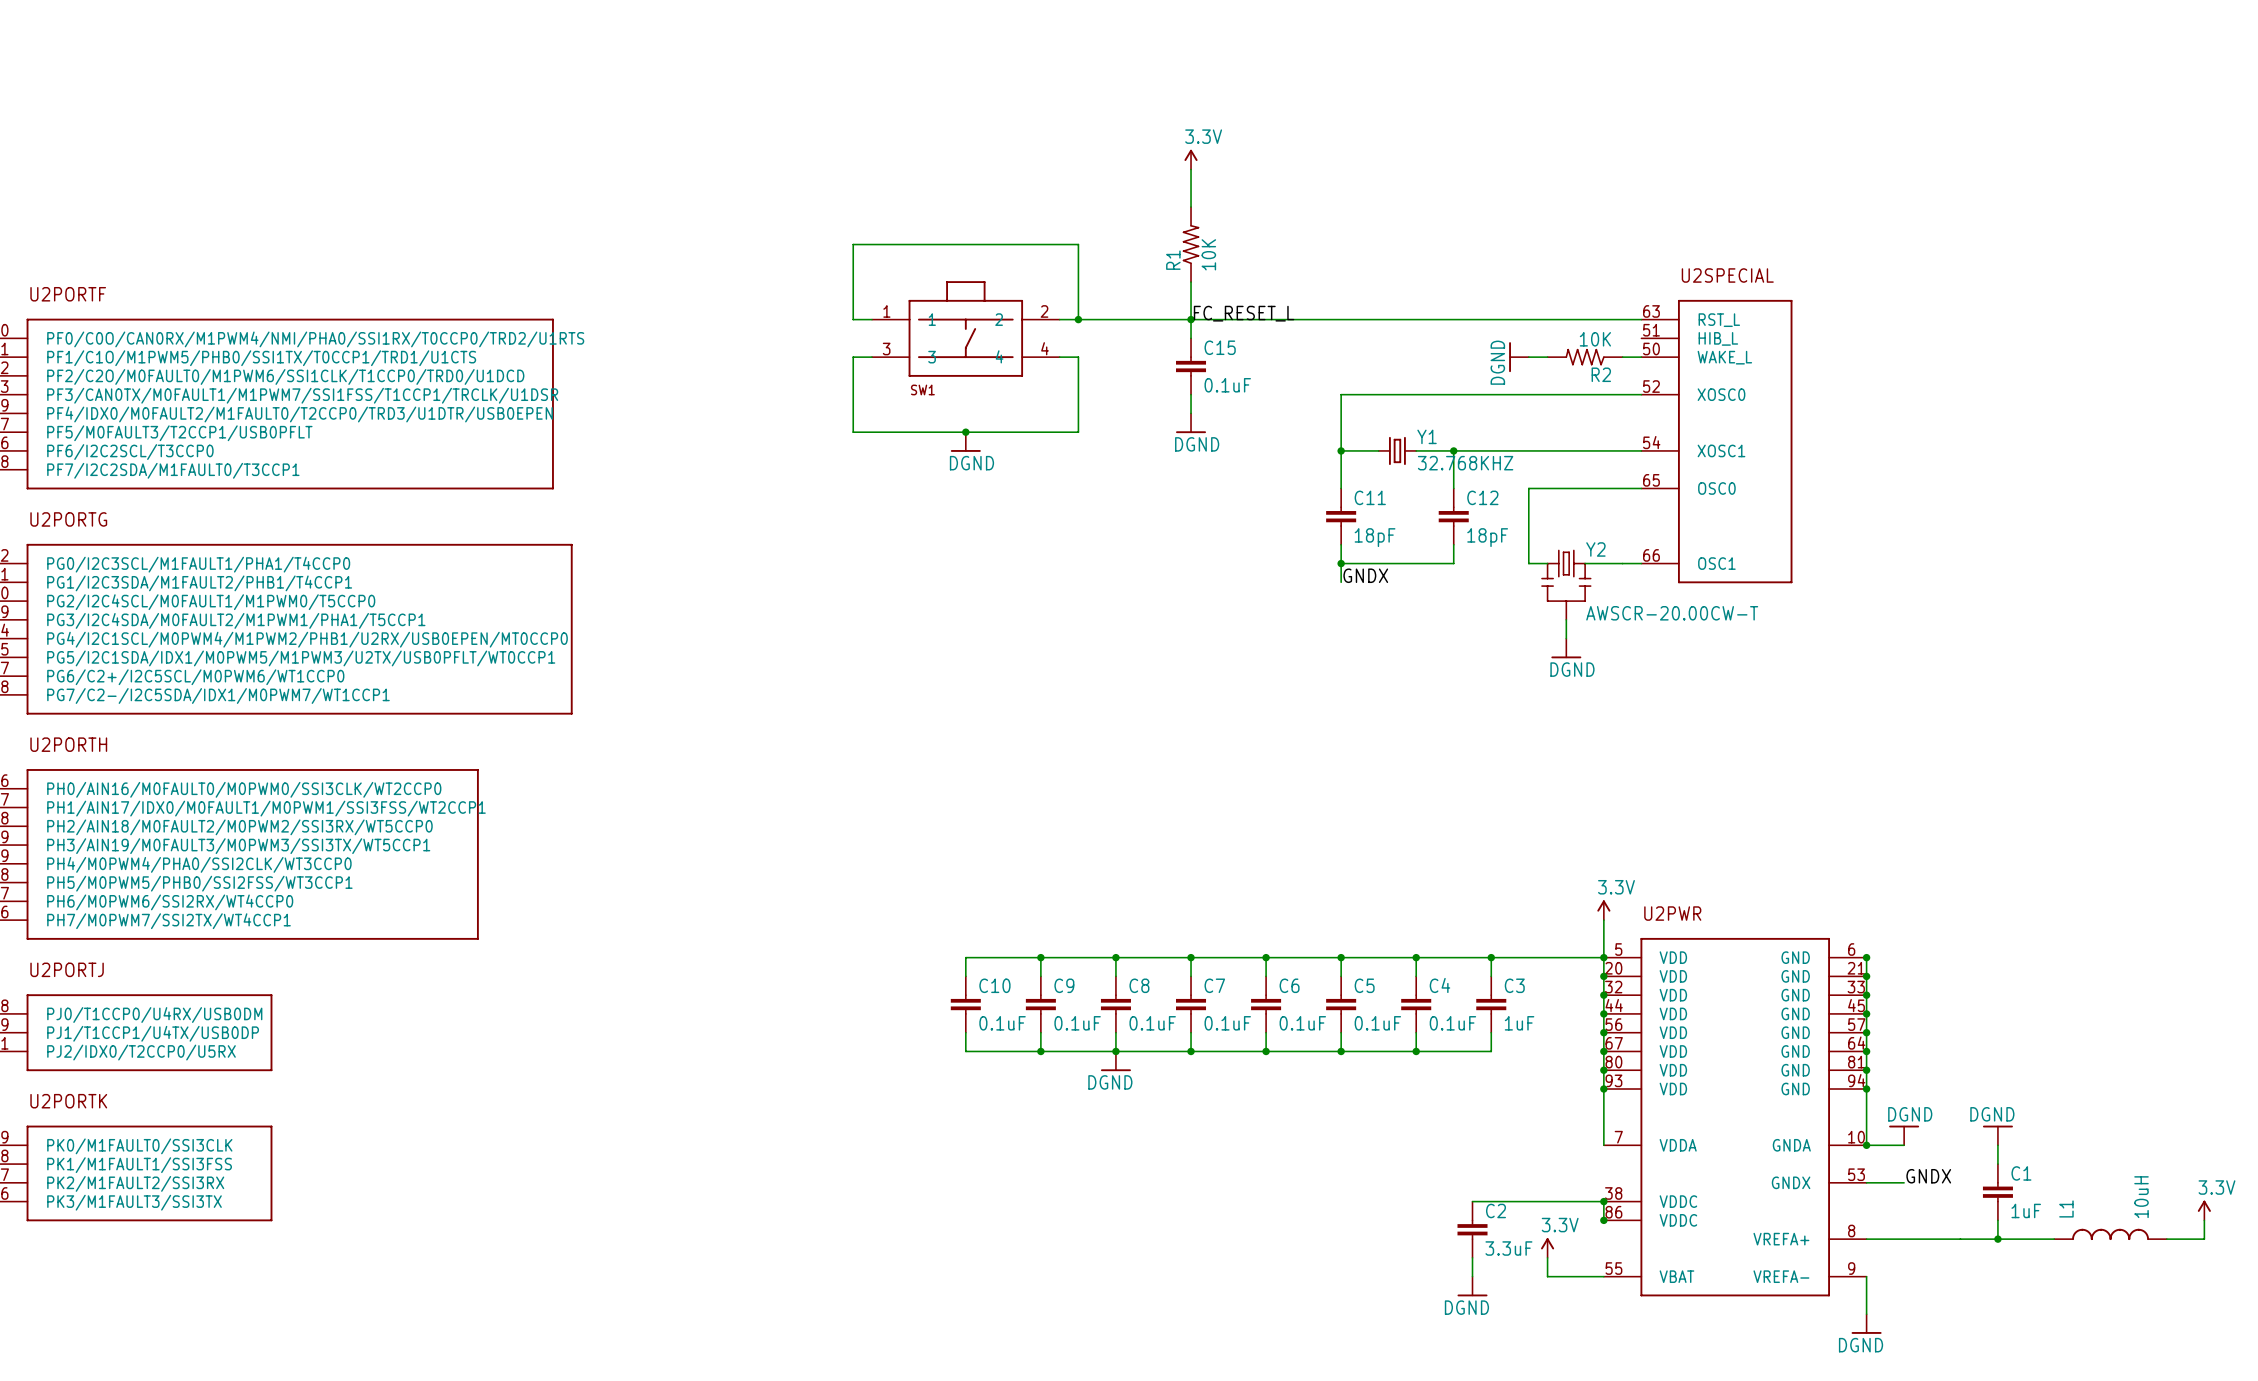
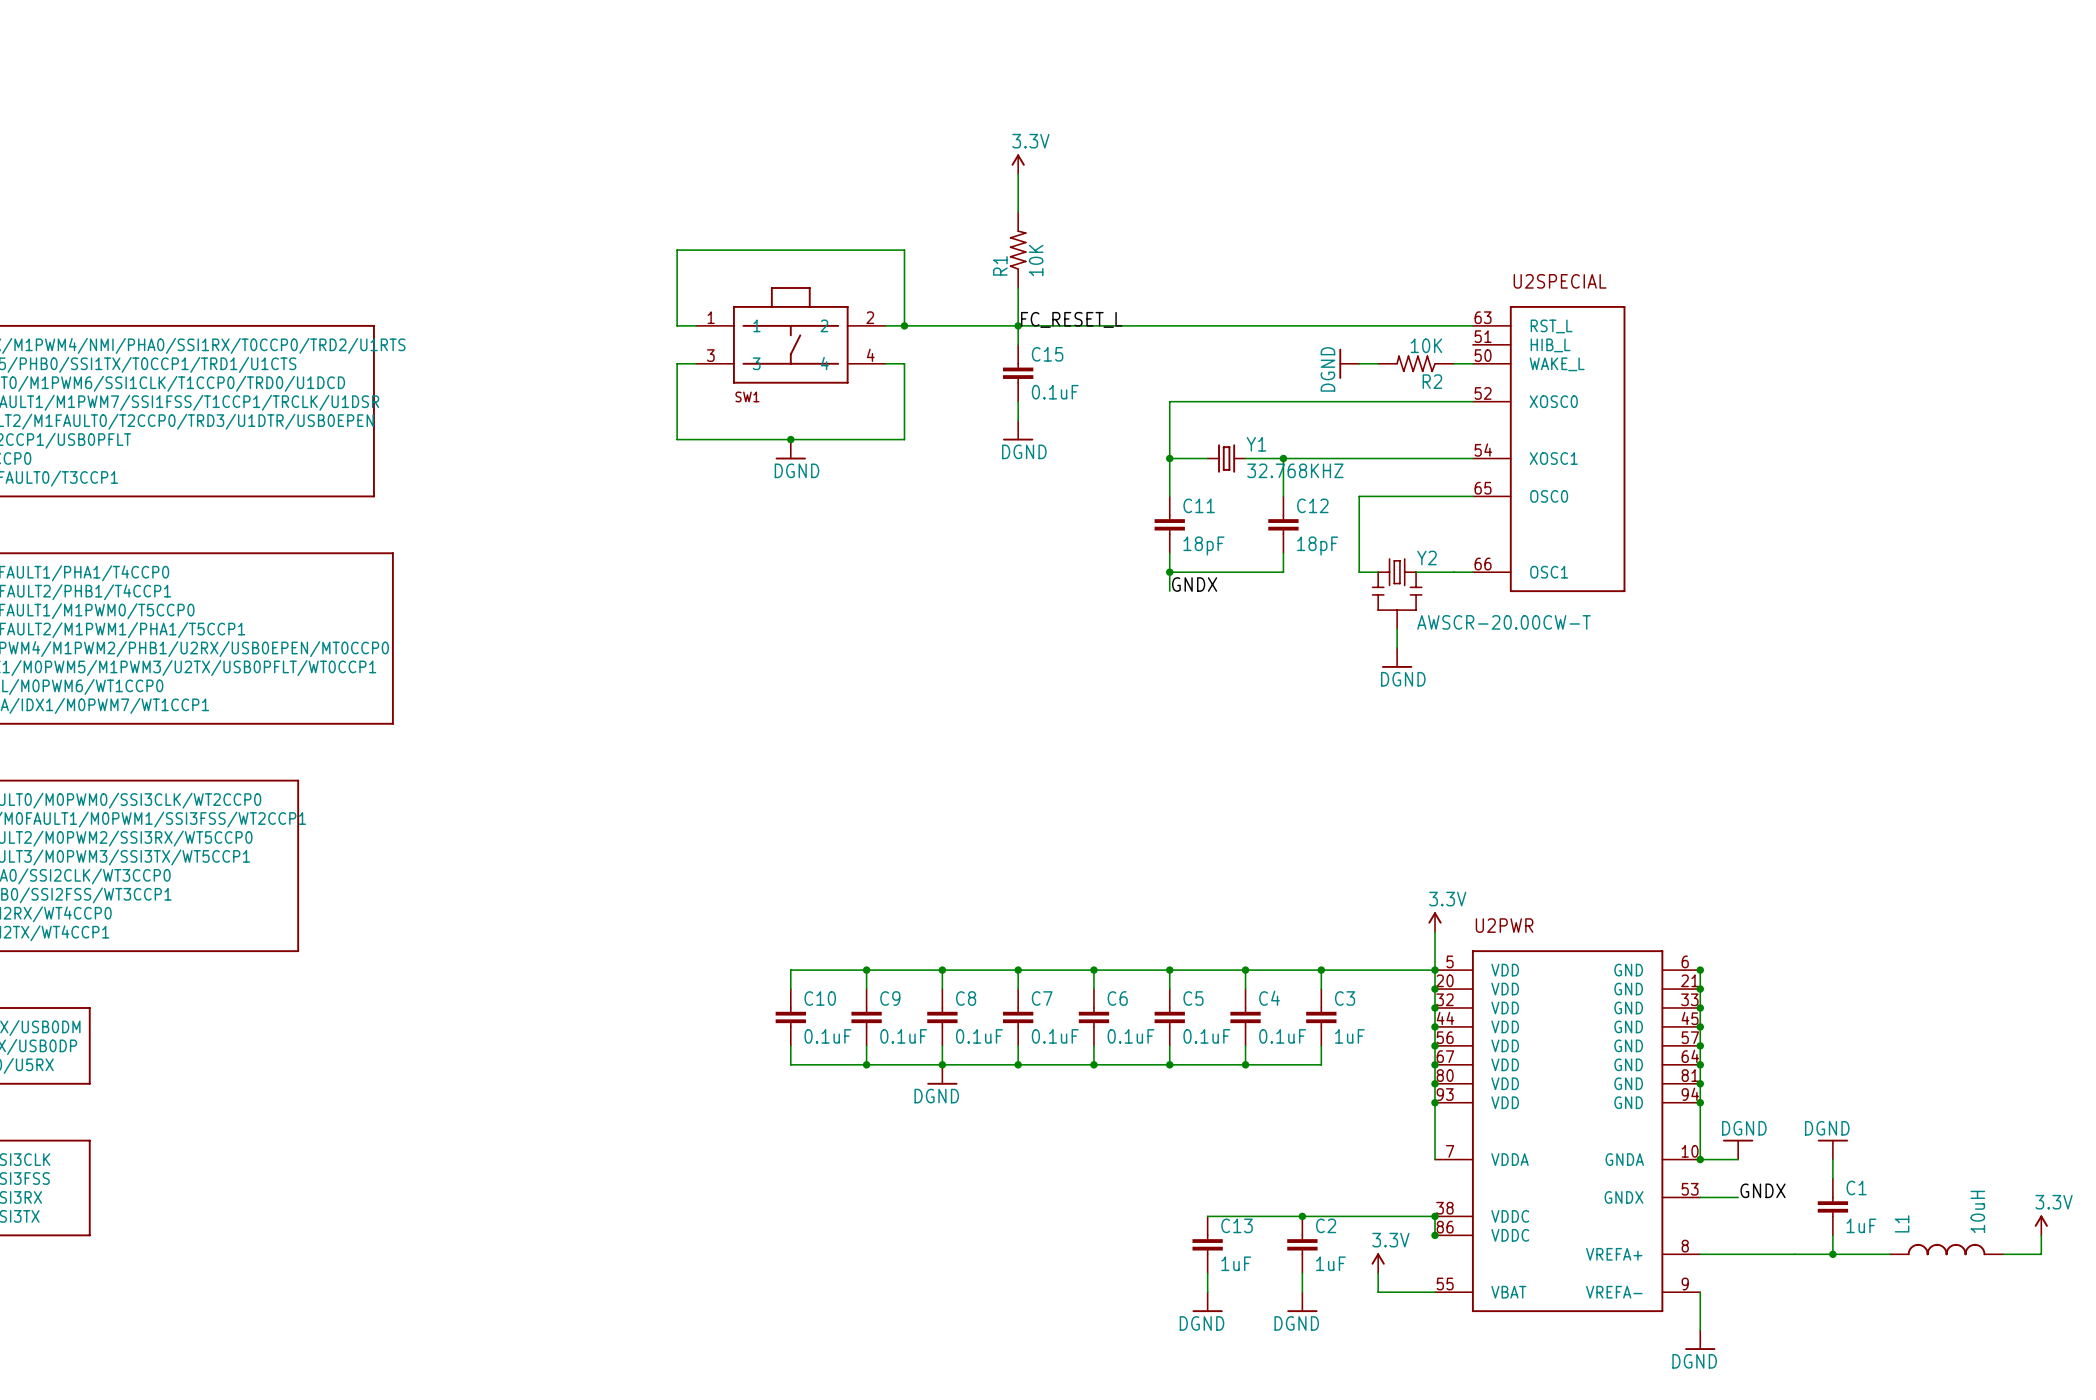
wire: none -> (1207, 1216) (1302, 1216)
junction: none -> (1302, 1216)
C13: none -> 1uF (1207, 1244)
C2 value: 3.3uF (1508, 1248) -> 1uF (1330, 1263)
wire: none -> (1207, 1273) (1207, 1292)
power symbol: none -> DGND (1207, 1302)

